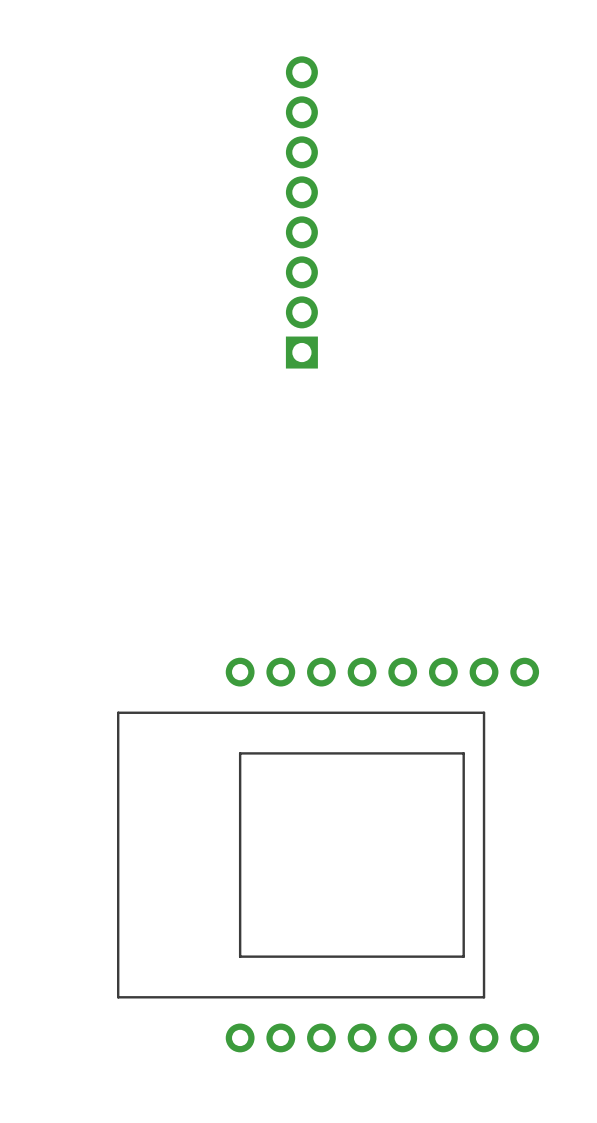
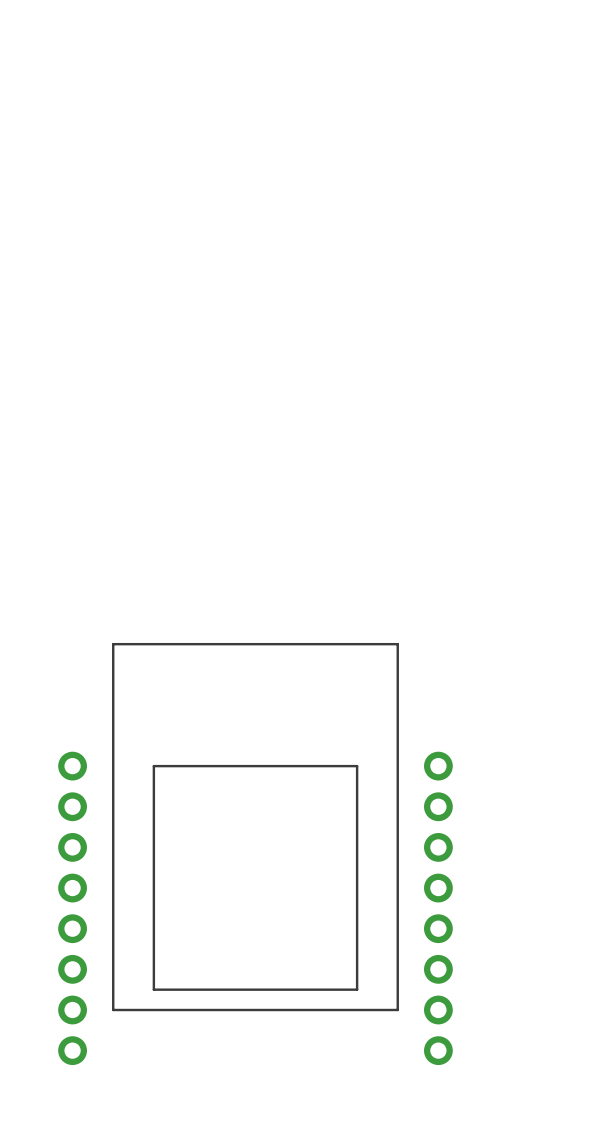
part: (301, 212) -> none
part rotation: 0° (328, 855) -> 90° clockwise (255, 854)

